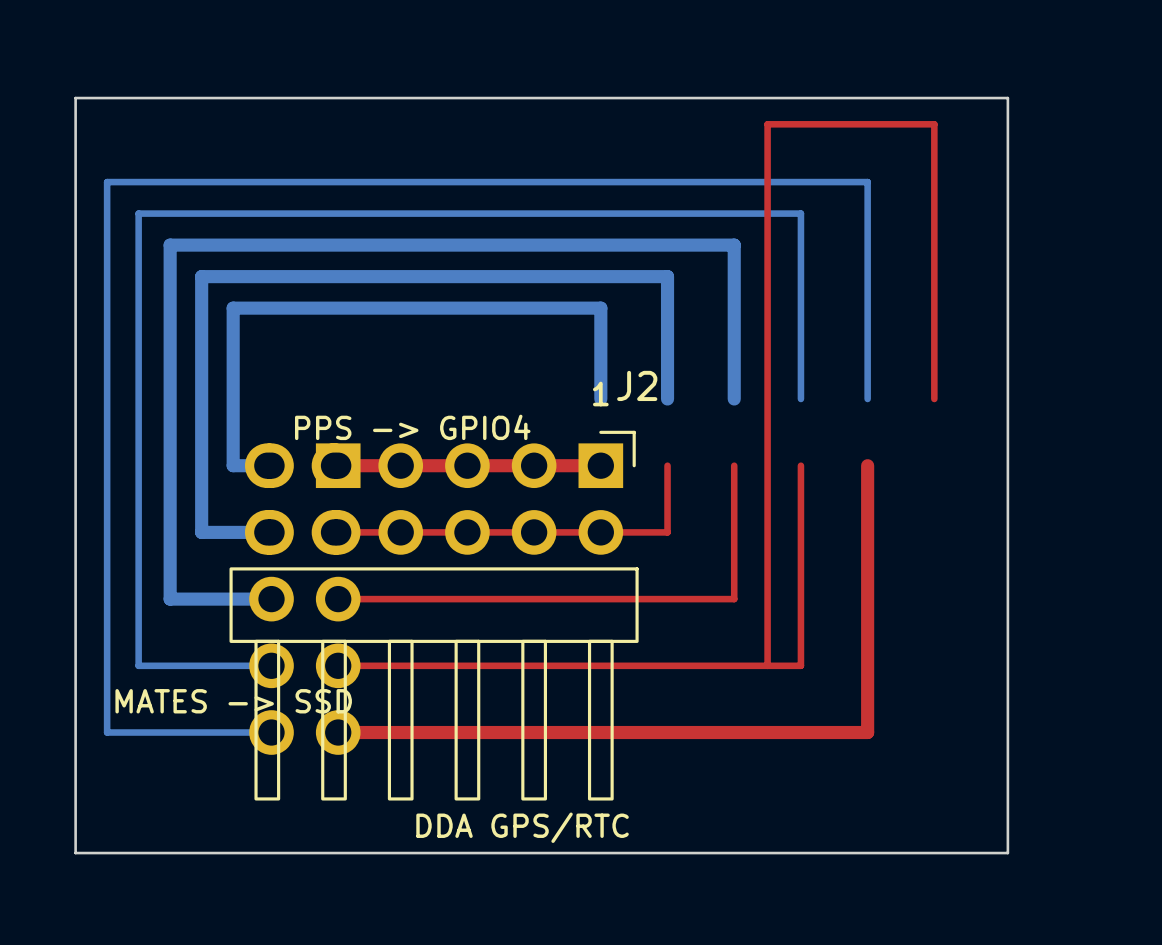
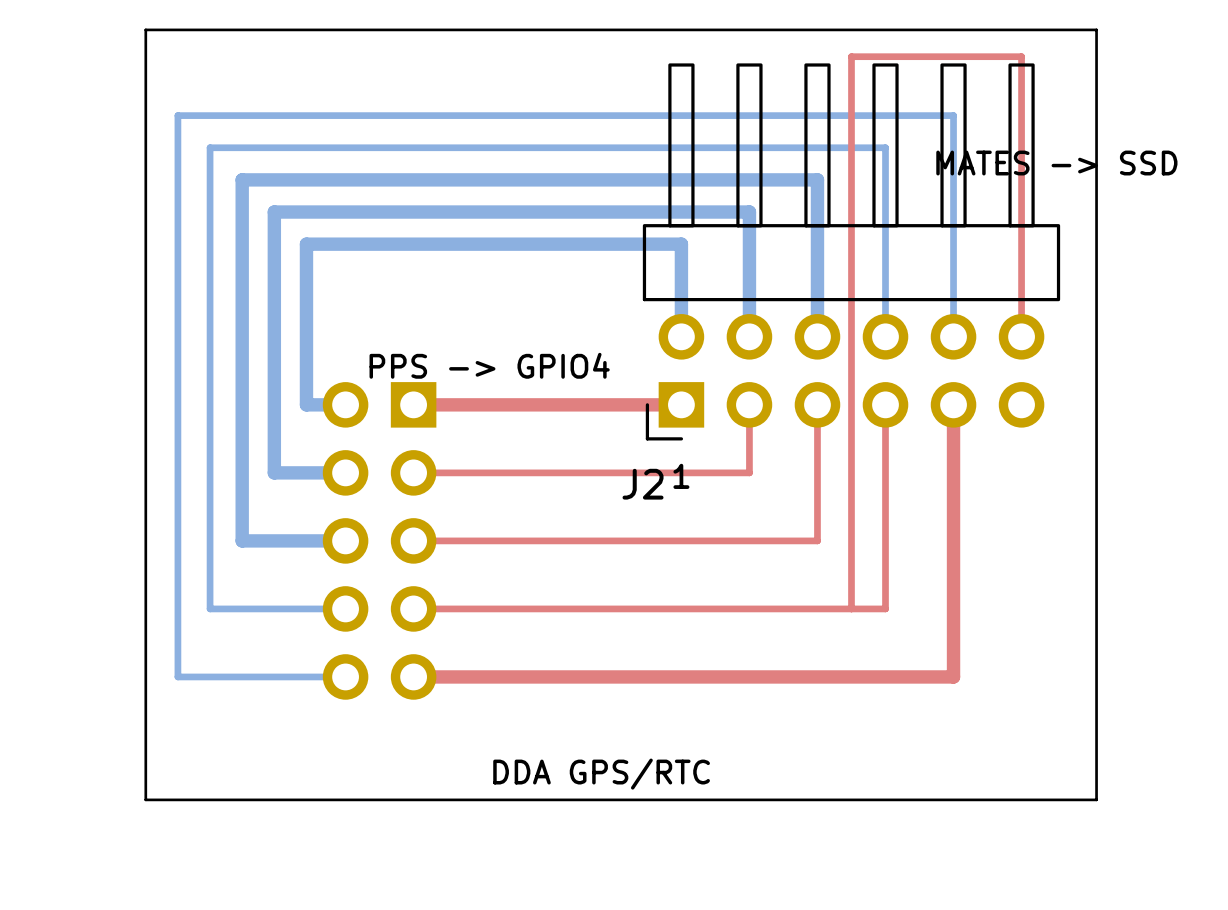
J2 rotation: 0° (434, 615) -> 180° (851, 251)
J2 position: (434, 615) -> (851, 251)

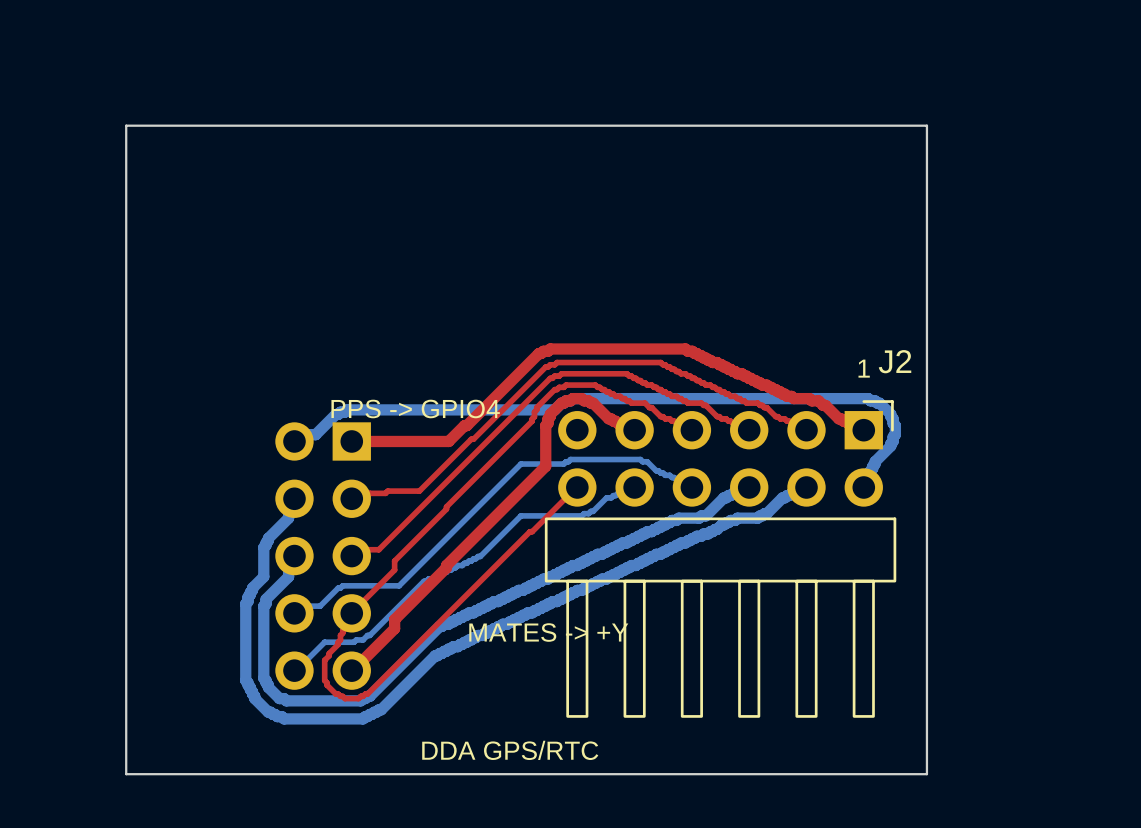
J2 footprint: [642, 63, 1061, 441] -> [544, 400, 897, 718]
bottom track: (681, 336) (681, 244) (306, 244) (306, 404) (345, 404) -> (863, 487) (875, 461) (890, 445) (895, 434) (895, 425) (890, 414) (879, 403) (868, 398) (572, 398) (561, 403) (554, 409) (347, 409) (335, 414) (315, 434) (308, 434) (302, 441) (294, 441)
bottom track: (749, 336) (749, 212) (274, 212) (274, 472) (345, 472) -> (806, 487) (782, 497) (766, 513) (757, 518) (737, 518) (730, 520) (708, 533) (681, 542) (660, 554) (656, 554) (606, 579) (602, 579) (581, 590) (577, 590) (557, 601) (552, 601) (532, 612) (527, 612) (507, 624) (502, 624) (482, 635) (478, 635) (457, 646) (453, 646) (435, 655) (381, 709) (363, 718) (284, 718) (268, 712) (254, 698) (245, 680) (245, 603) (252, 588) (263, 576) (263, 547) (268, 538) (288, 518) (288, 511) (295, 504) (294, 498)
bottom track: (817, 336) (817, 179) (242, 179) (242, 540) (345, 540) -> (749, 487) (723, 497) (705, 515) (672, 520) (626, 542) (622, 542) (577, 565) (572, 565) (548, 579) (543, 579) (523, 590) (518, 590) (498, 601) (493, 601) (473, 612) (469, 612) (448, 624) (439, 626) (369, 696) (360, 700) (286, 700) (279, 698) (268, 687) (263, 678) (263, 606) (266, 599) (288, 576) (288, 570) (295, 563) (294, 556)
bottom track: (885, 336) (885, 147) (210, 147) (210, 608) (345, 608) -> (691, 487) (690, 484) (685, 484) (669, 475) (656, 470) (647, 461) (640, 459) (570, 459) (563, 464) (520, 464) (399, 585) (342, 585) (320, 606) (308, 606) (302, 612) (294, 613)
bottom track: (953, 336) (953, 115) (177, 115) (177, 676) (345, 676) -> (634, 487) (626, 488) (611, 497) (606, 497) (593, 511) (581, 515) (520, 515) (480, 556) (462, 565) (457, 565) (432, 579) (423, 581) (369, 635) (354, 642) (324, 642) (294, 670)
top track: (1021, 336) (1021, 56) (851, 56) (851, 608) -> none
top track: none -> (692, 430) (660, 416) (645, 403) (631, 403) (595, 385) (566, 385) (554, 389) (536, 407) (532, 421) (394, 561) (394, 570) (349, 615) (349, 619) (340, 635) (338, 644) (324, 660) (324, 680) (326, 685) (335, 694) (345, 698) (358, 698) (367, 694) (529, 531) (532, 531) (577, 487)
top track: (528, 404) (681, 404) -> (448, 441) (538, 353) (550, 349) (685, 349) (737, 373) (741, 373) (762, 385) (766, 385) (787, 396) (818, 400) (838, 418) (863, 430)
top track: (749, 404) (749, 472) (413, 472) -> (806, 430) (784, 418) (775, 416) (766, 407) (757, 403) (746, 403) (685, 373) (681, 373) (660, 362) (557, 362) (545, 367) (419, 491) (387, 491) (385, 493) (369, 493) (365, 497) (351, 498)
top track: (817, 404) (817, 540) (413, 540) -> (749, 430) (717, 416) (701, 403) (687, 403) (626, 373) (561, 373) (550, 378) (378, 549) (365, 549) (358, 556) (351, 556)
top track: (885, 404) (885, 608) (413, 608) -> none
top track: (953, 404) (953, 676) (413, 676) -> (634, 430) (608, 418) (588, 400) (572, 398) (561, 403) (550, 414) (545, 425) (545, 466) (394, 619) (394, 628) (351, 670)
J2 name position: J2 (643, 484) -> J2 (895, 361)

